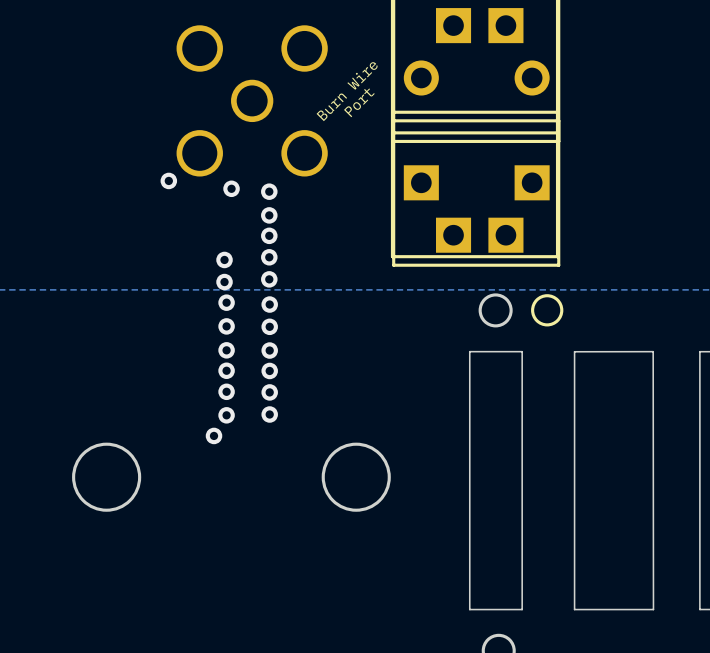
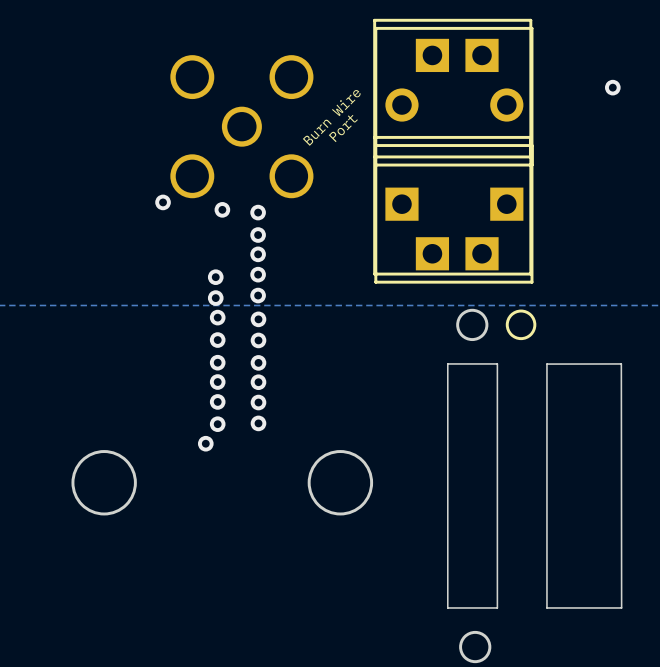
via: none -> (612, 87)

